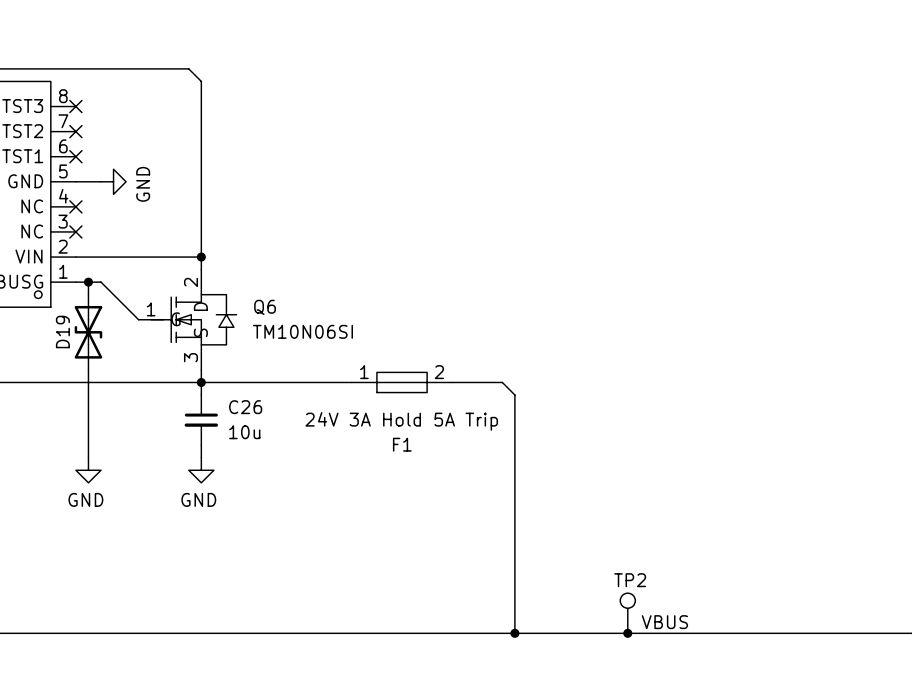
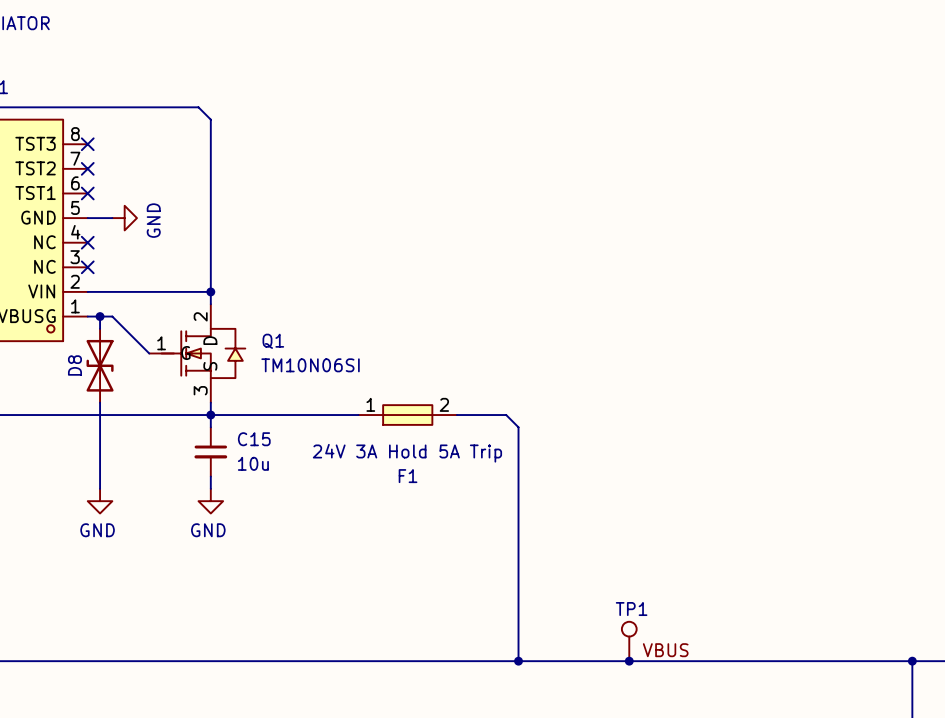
Q6 name: Q6 (265, 307) -> Q1 (273, 341)
D19 name: D19 (62, 332) -> D8 (74, 365)
C26 name: C26 (245, 407) -> C15 (254, 439)
TP2 name: TP2 (630, 580) -> TP1 (631, 609)

